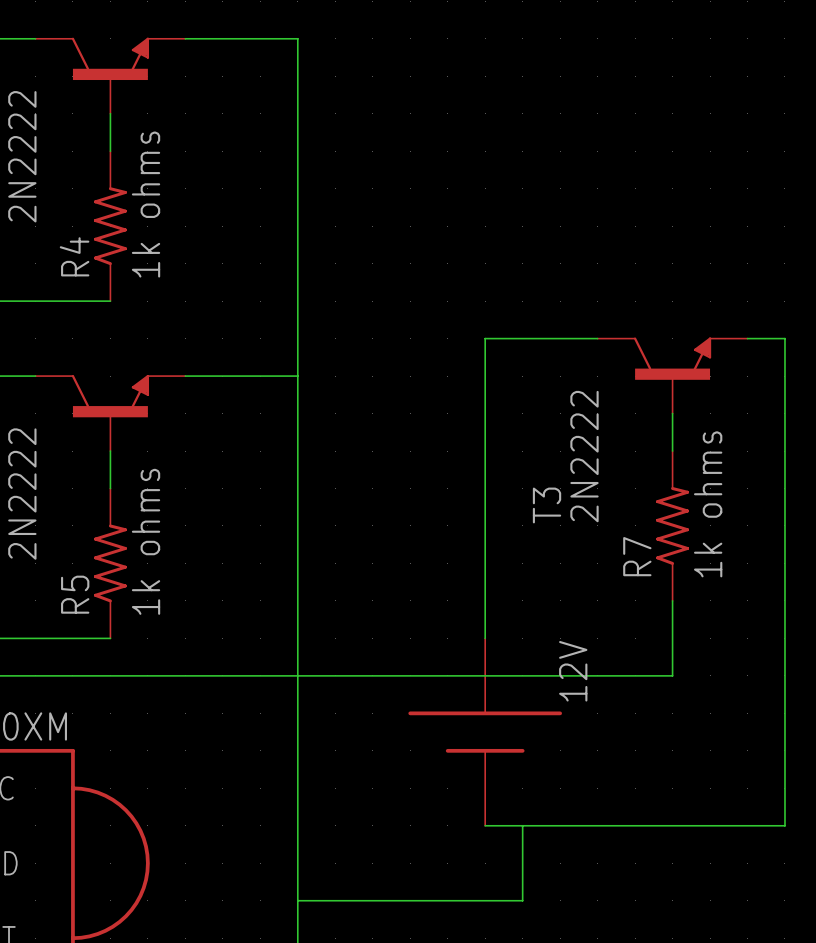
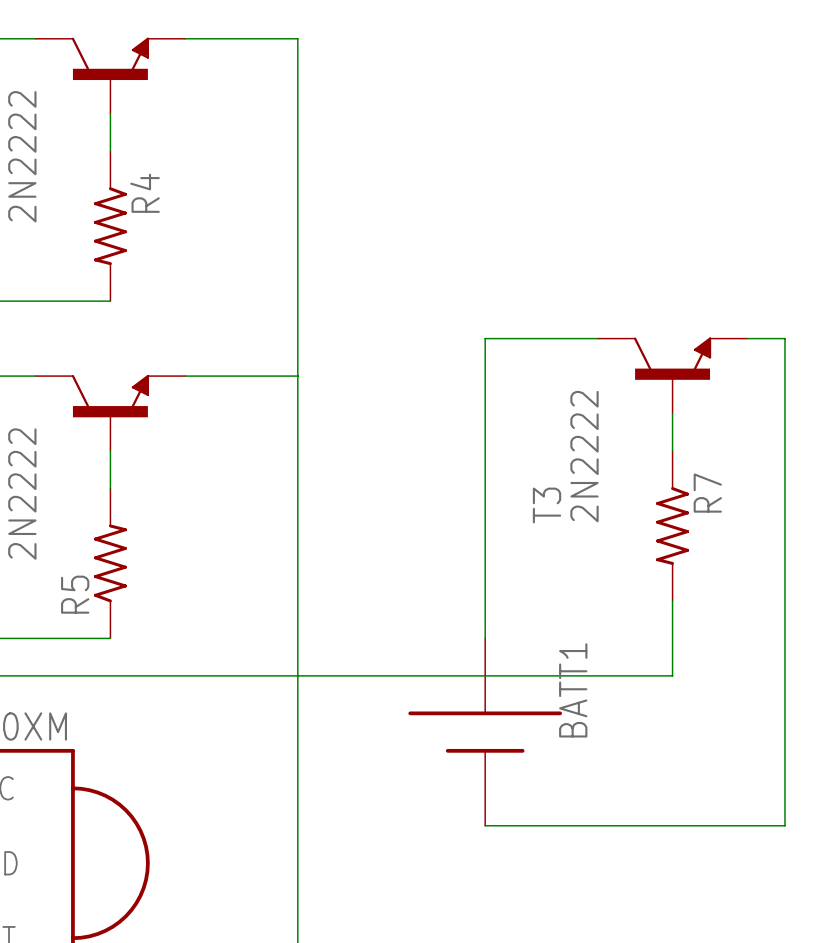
R4 value: 1k ohms (146, 204) -> none
R4 rotation: 0° (110, 226) -> 180° (110, 226)
R7 value: 1k ohms (708, 504) -> none
R7 rotation: 0° (672, 525) -> 180° (672, 525)
R5 value: 1k ohms (146, 541) -> none
12V name: 12V (573, 671) -> BATT1 (573, 690)
wire: (522, 825) (522, 900) (297, 900) -> none

